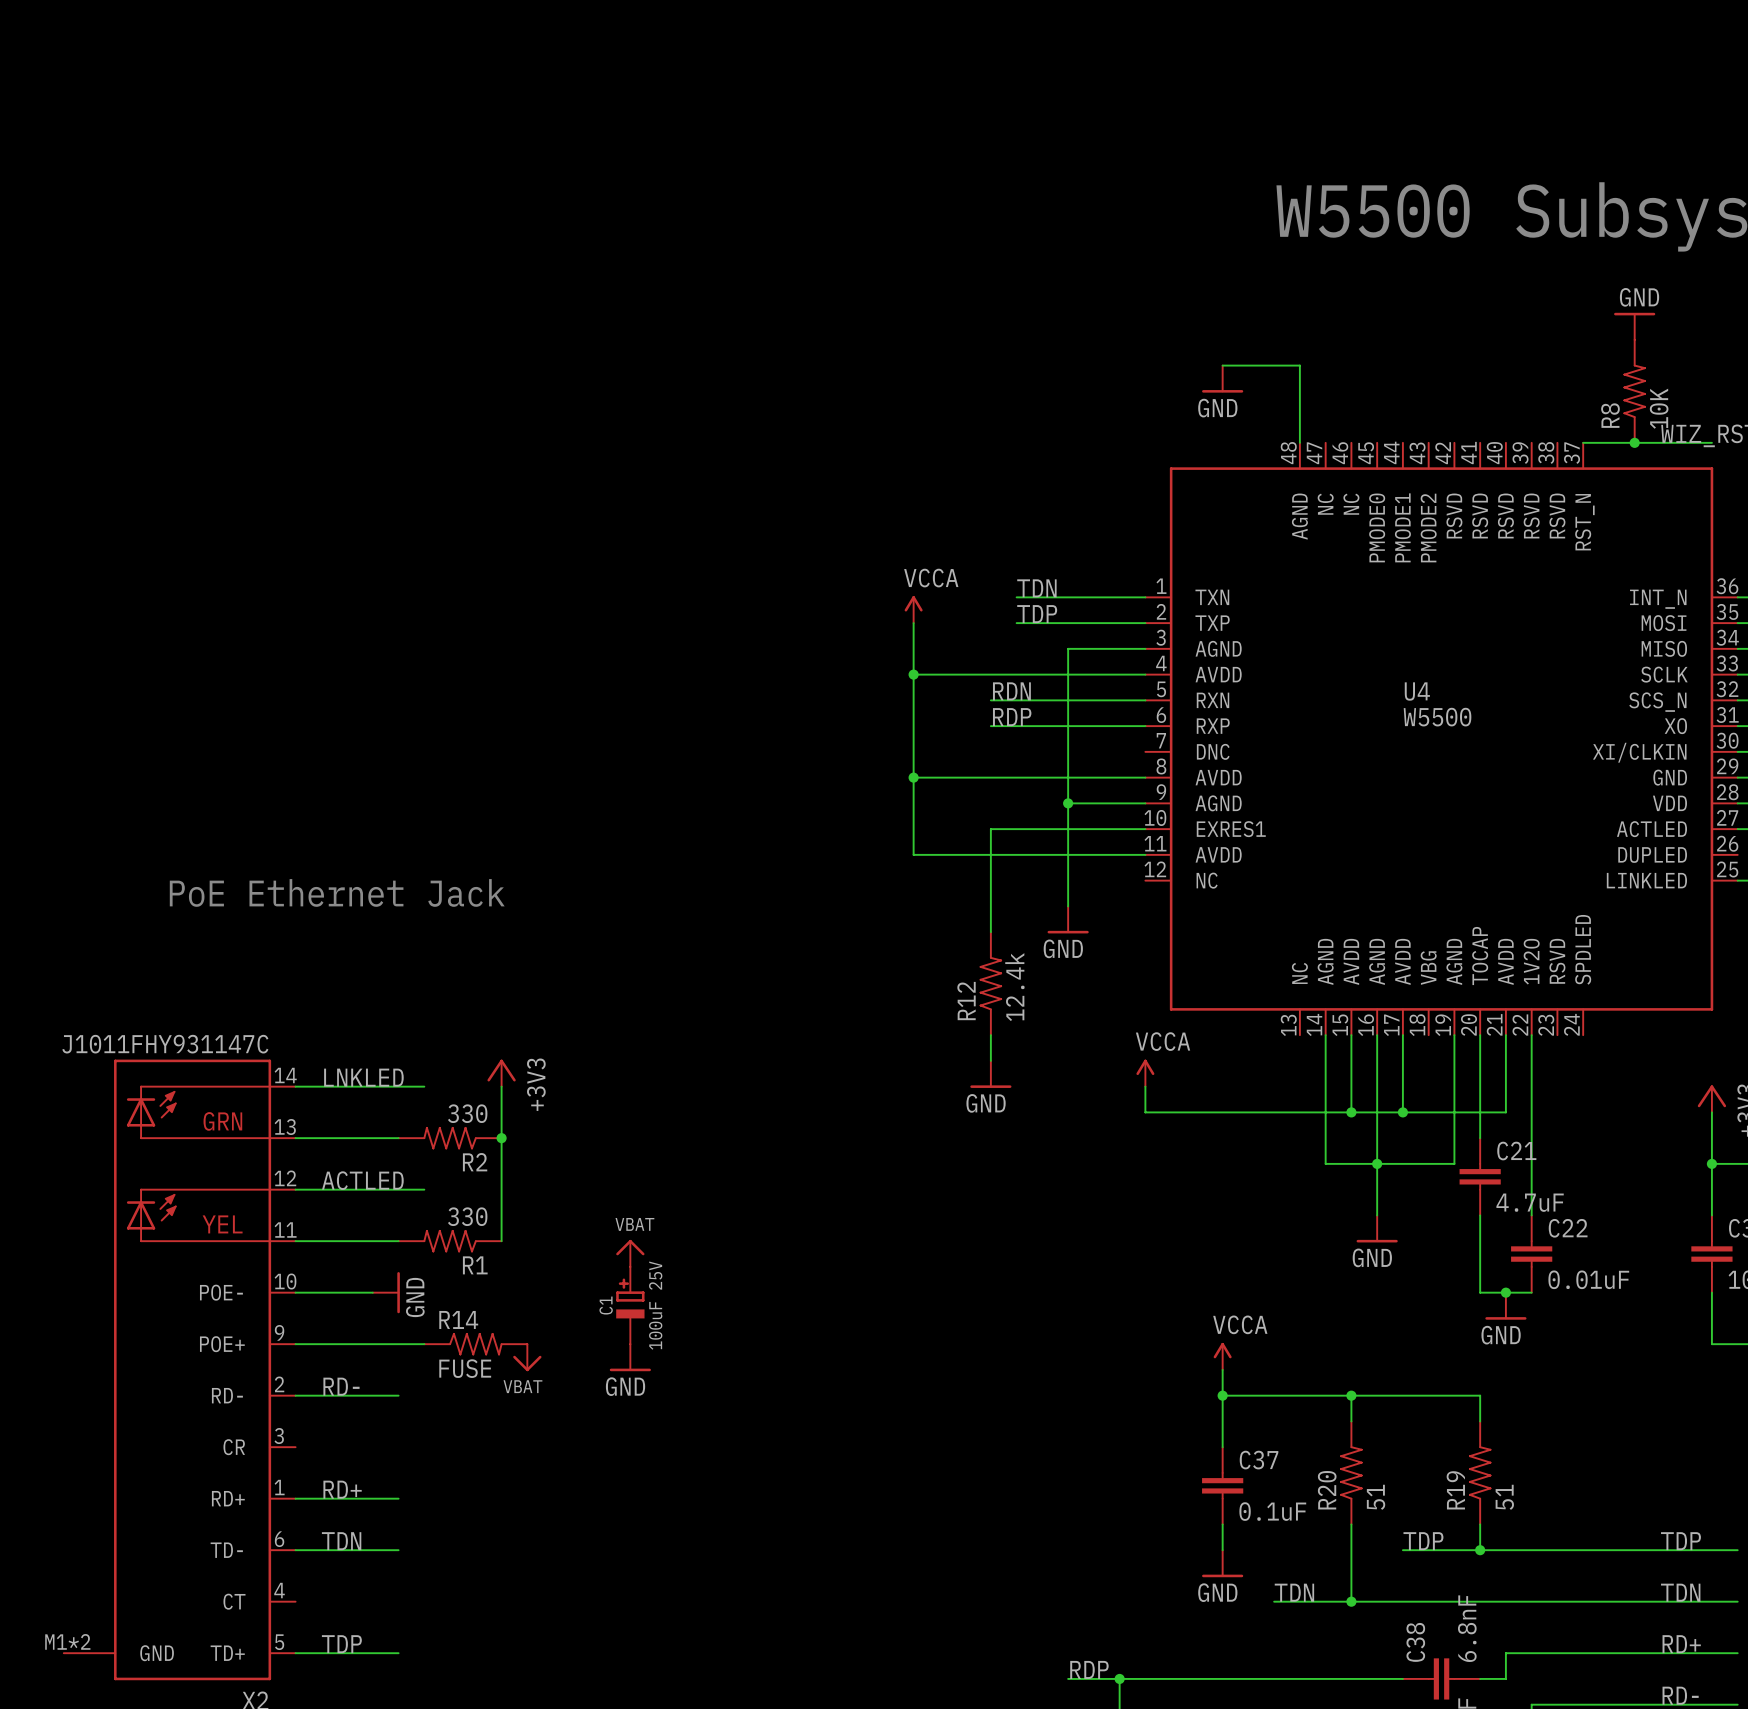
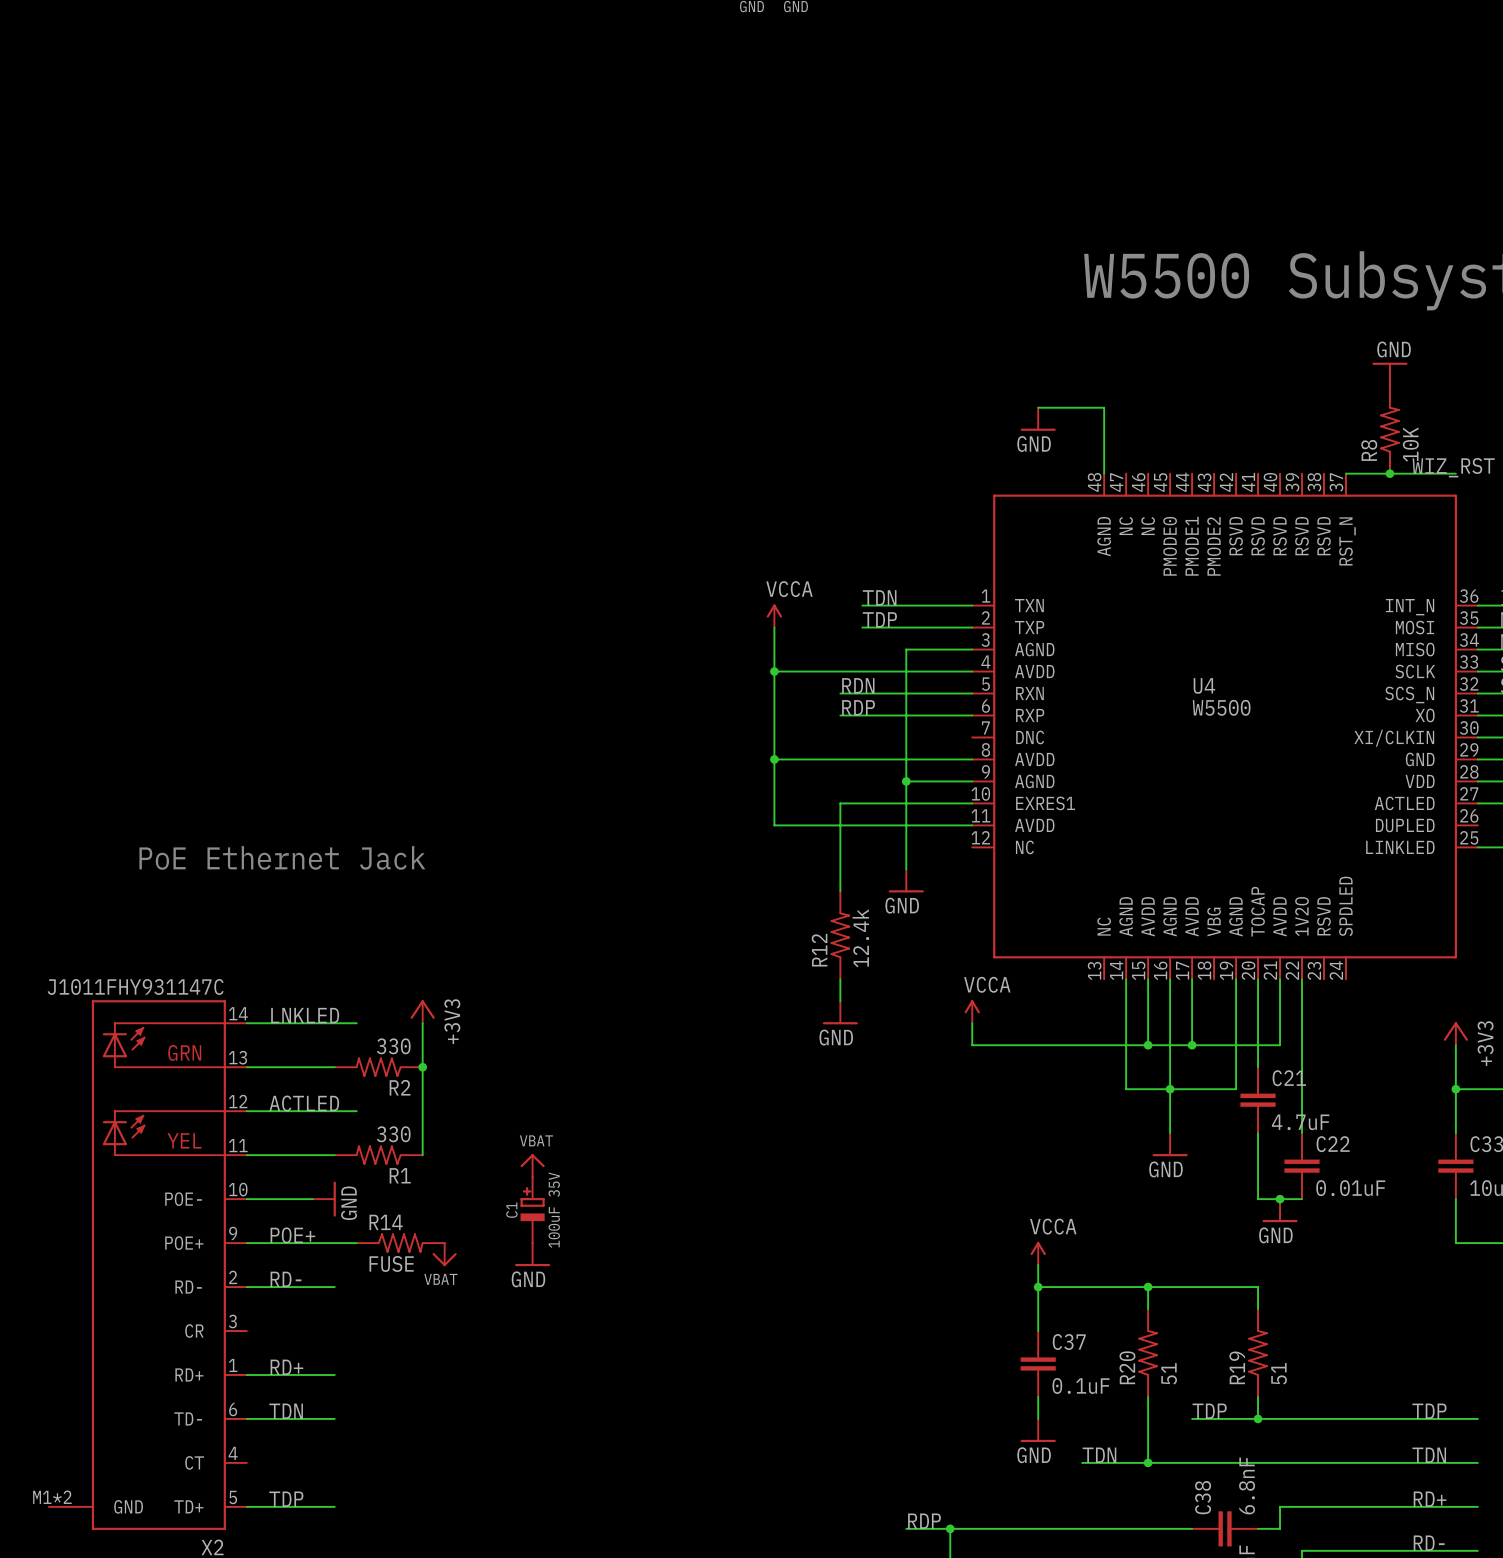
C1 value: 100uF 25V (655, 1305) -> 100uF 35V (554, 1210)
label: none -> POE+ (292, 1235)

